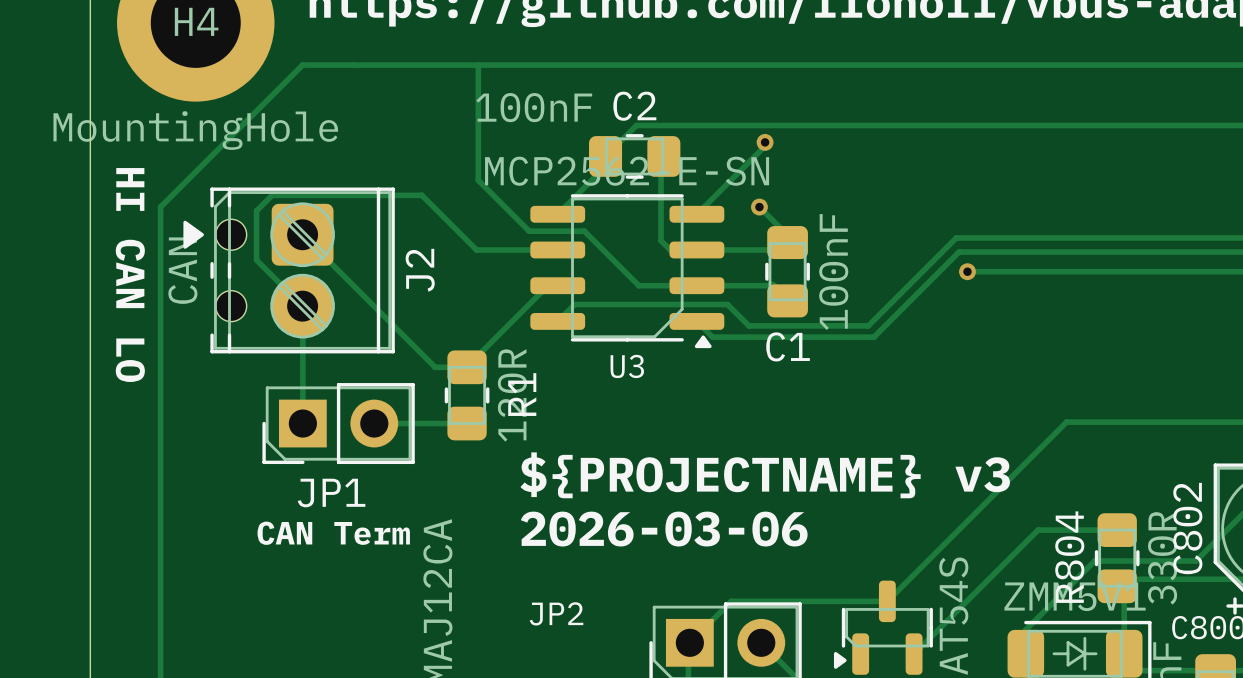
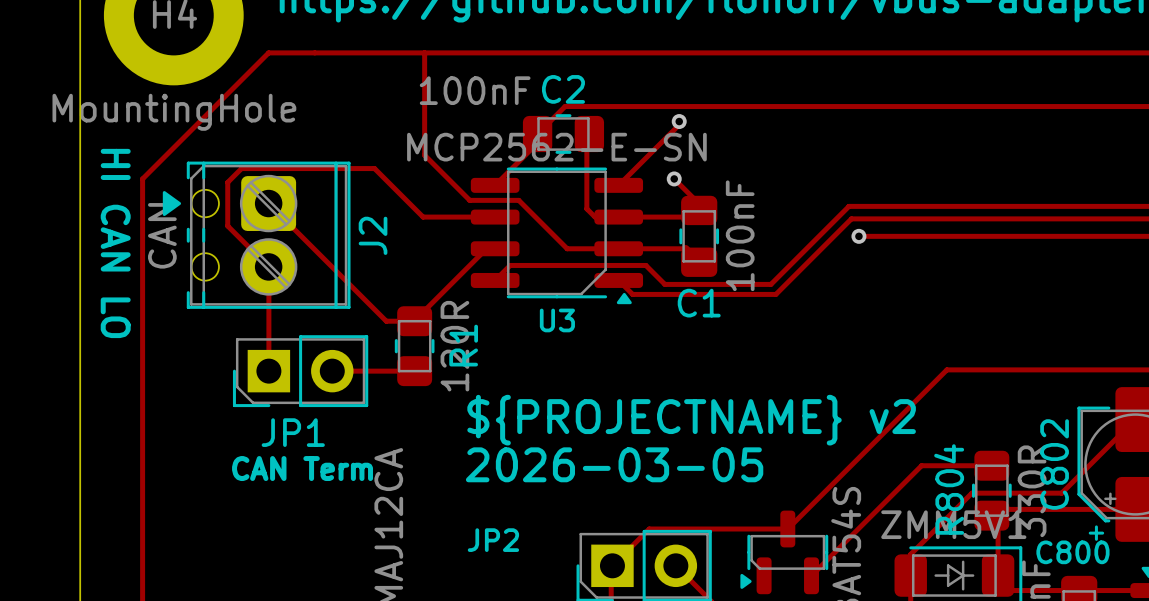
text: ${PROJECTNAME} v3 (765, 475) -> ${PROJECTNAME} v2 (691, 420)
text: 2026-03-06 (664, 529) -> 2026-03-05 (614, 464)

